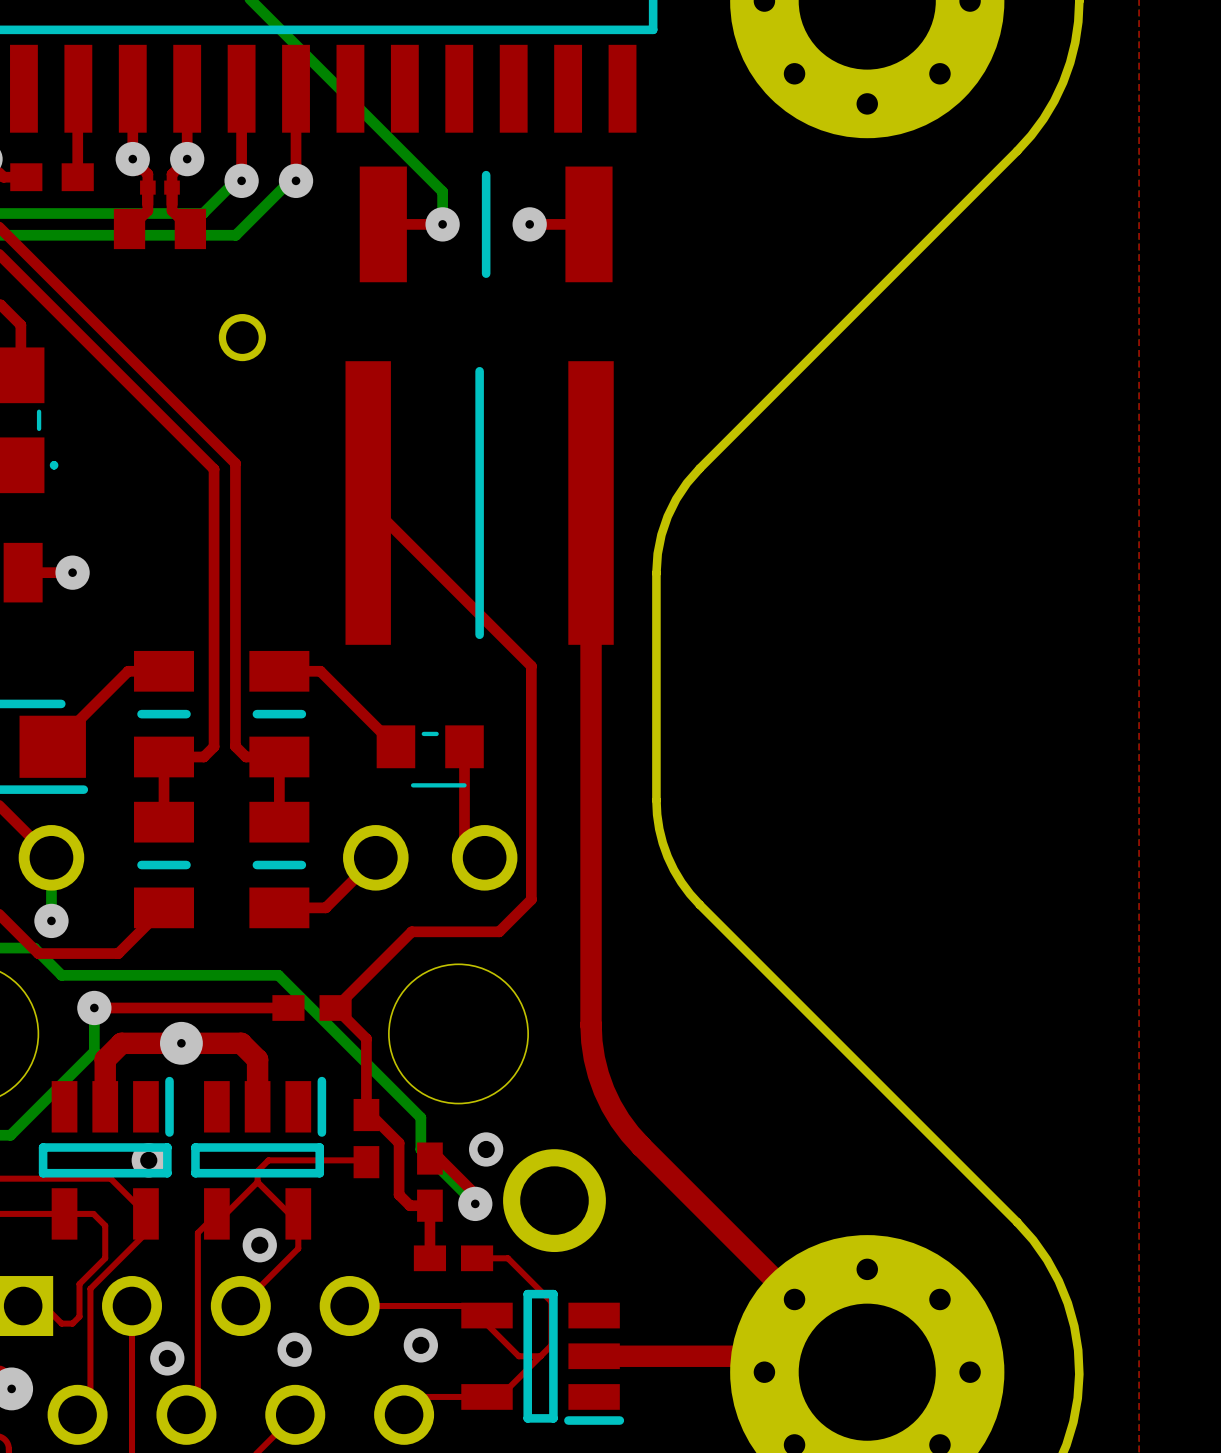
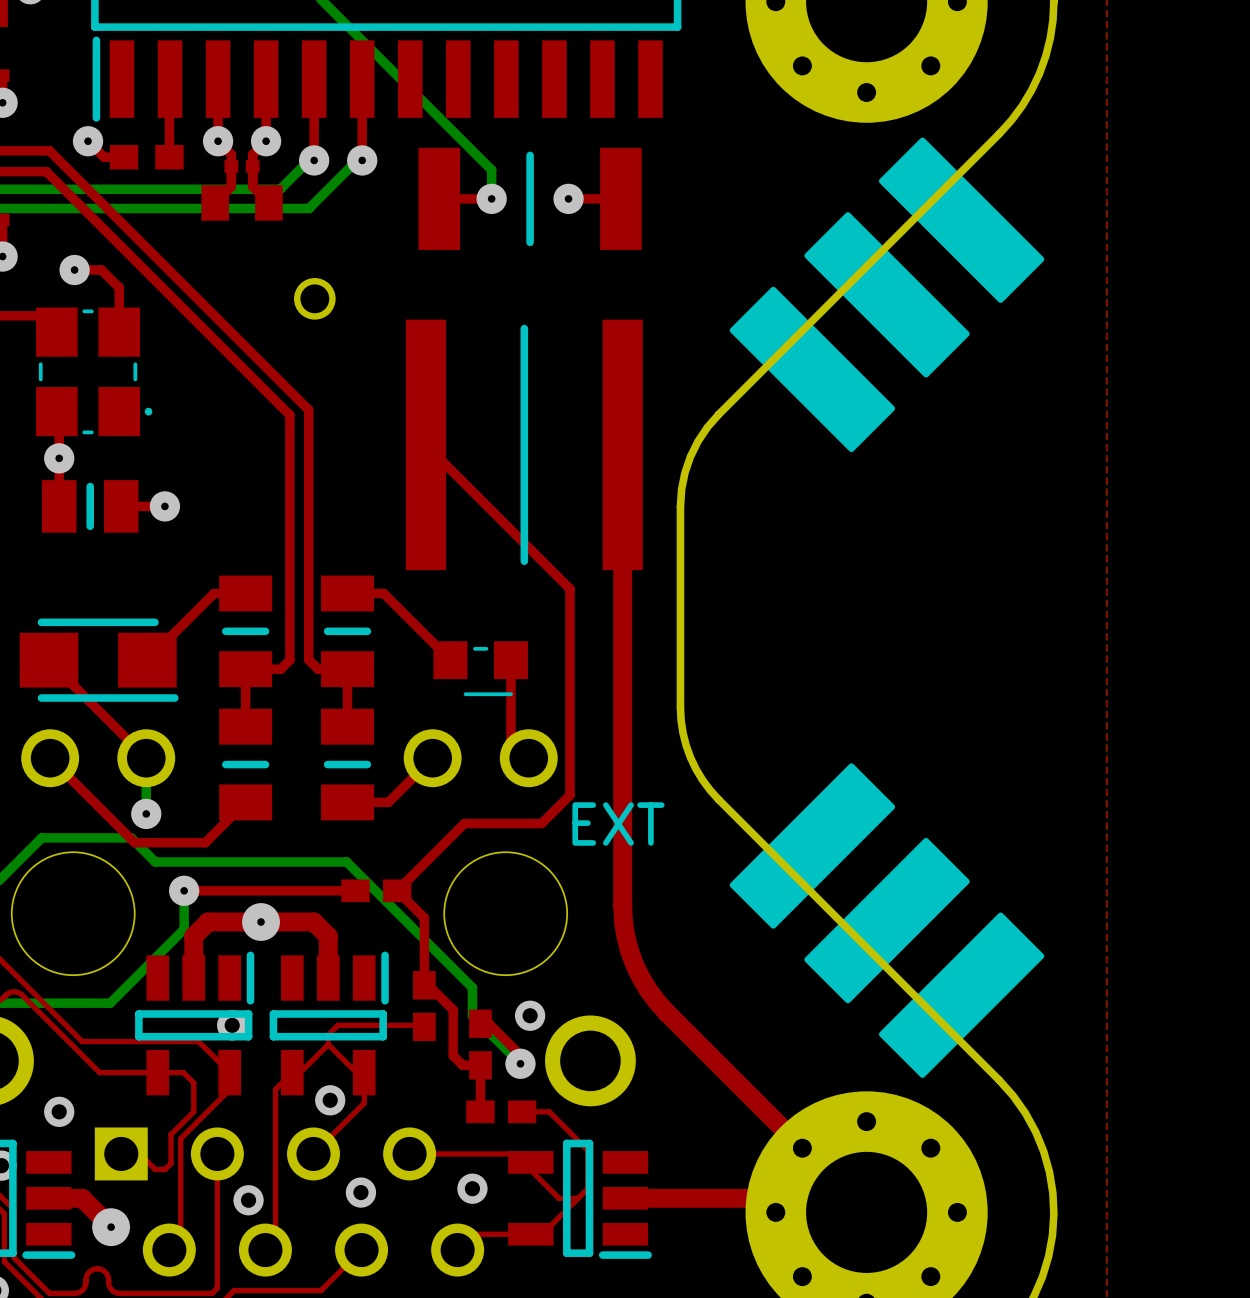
drawing: none -> [729, 137, 1045, 453]
drawing: none -> [729, 763, 1045, 1078]
text: none -> EXT (618, 824)

